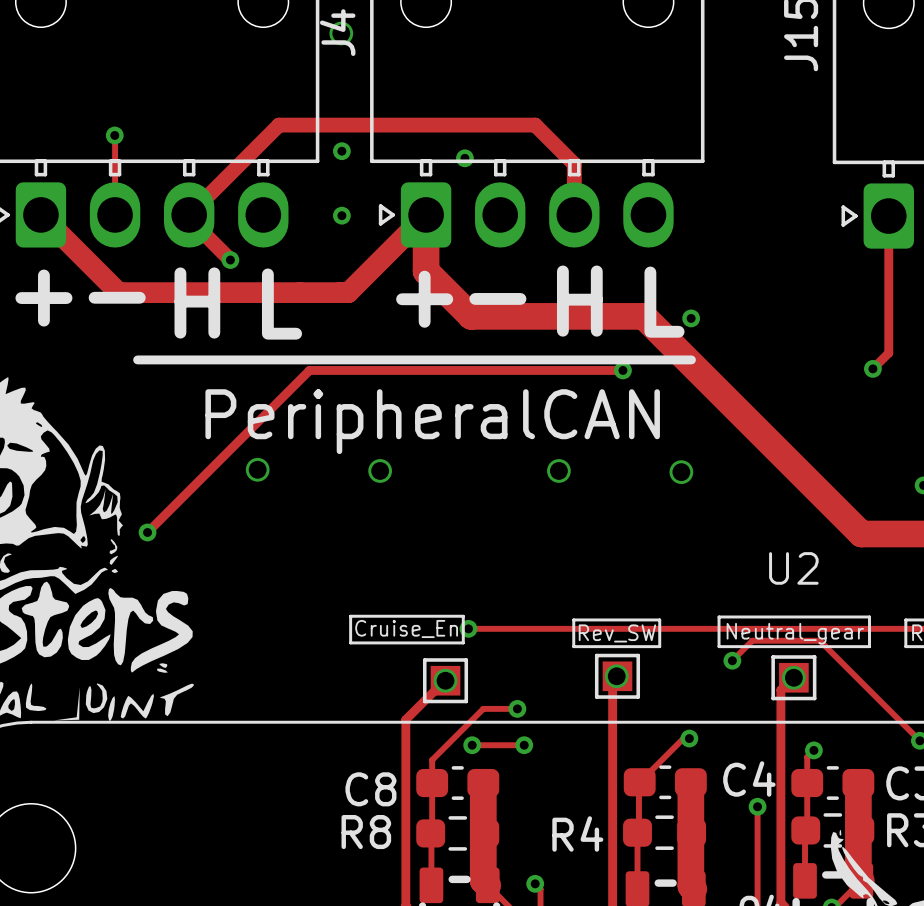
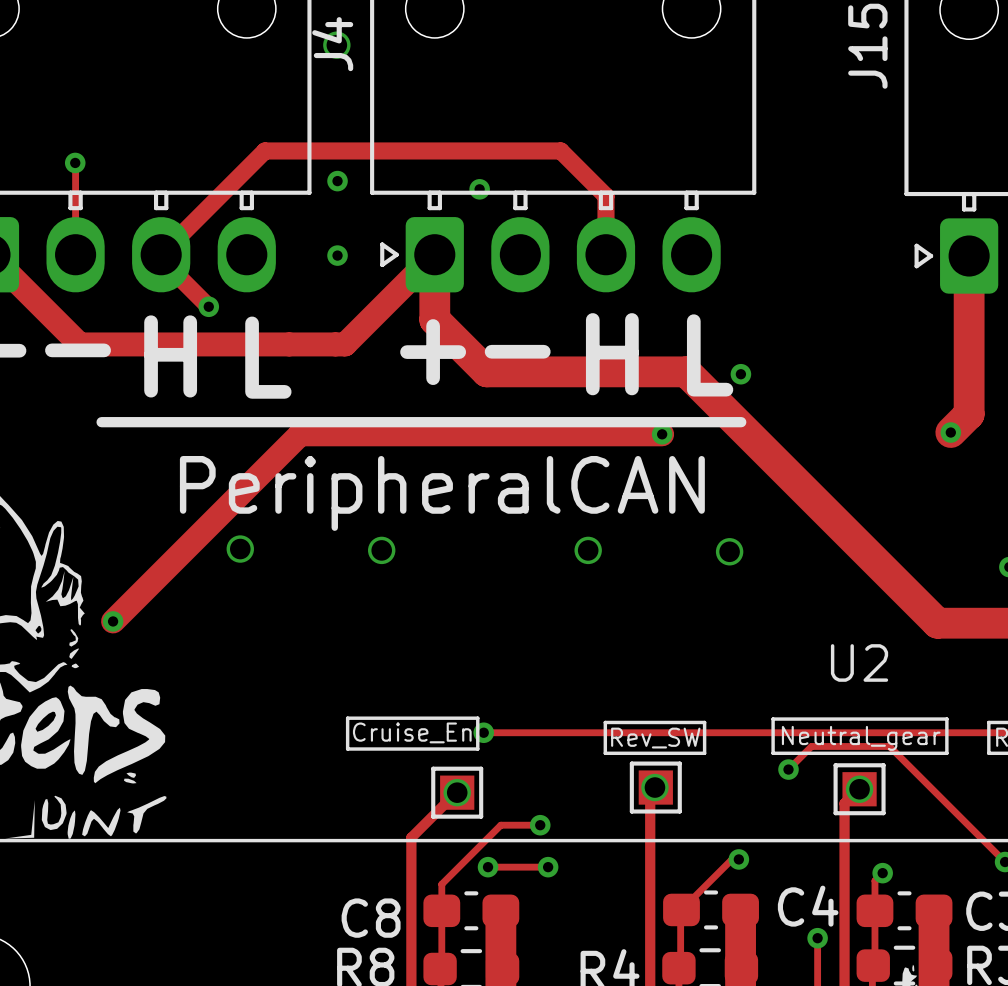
track width: thin (888, 216) (888, 353) (872, 368) -> thick (969, 256) (969, 414) (950, 432)
track width: thin (622, 370) (309, 370) (147, 532) -> thick (662, 434) (300, 434) (113, 621)

